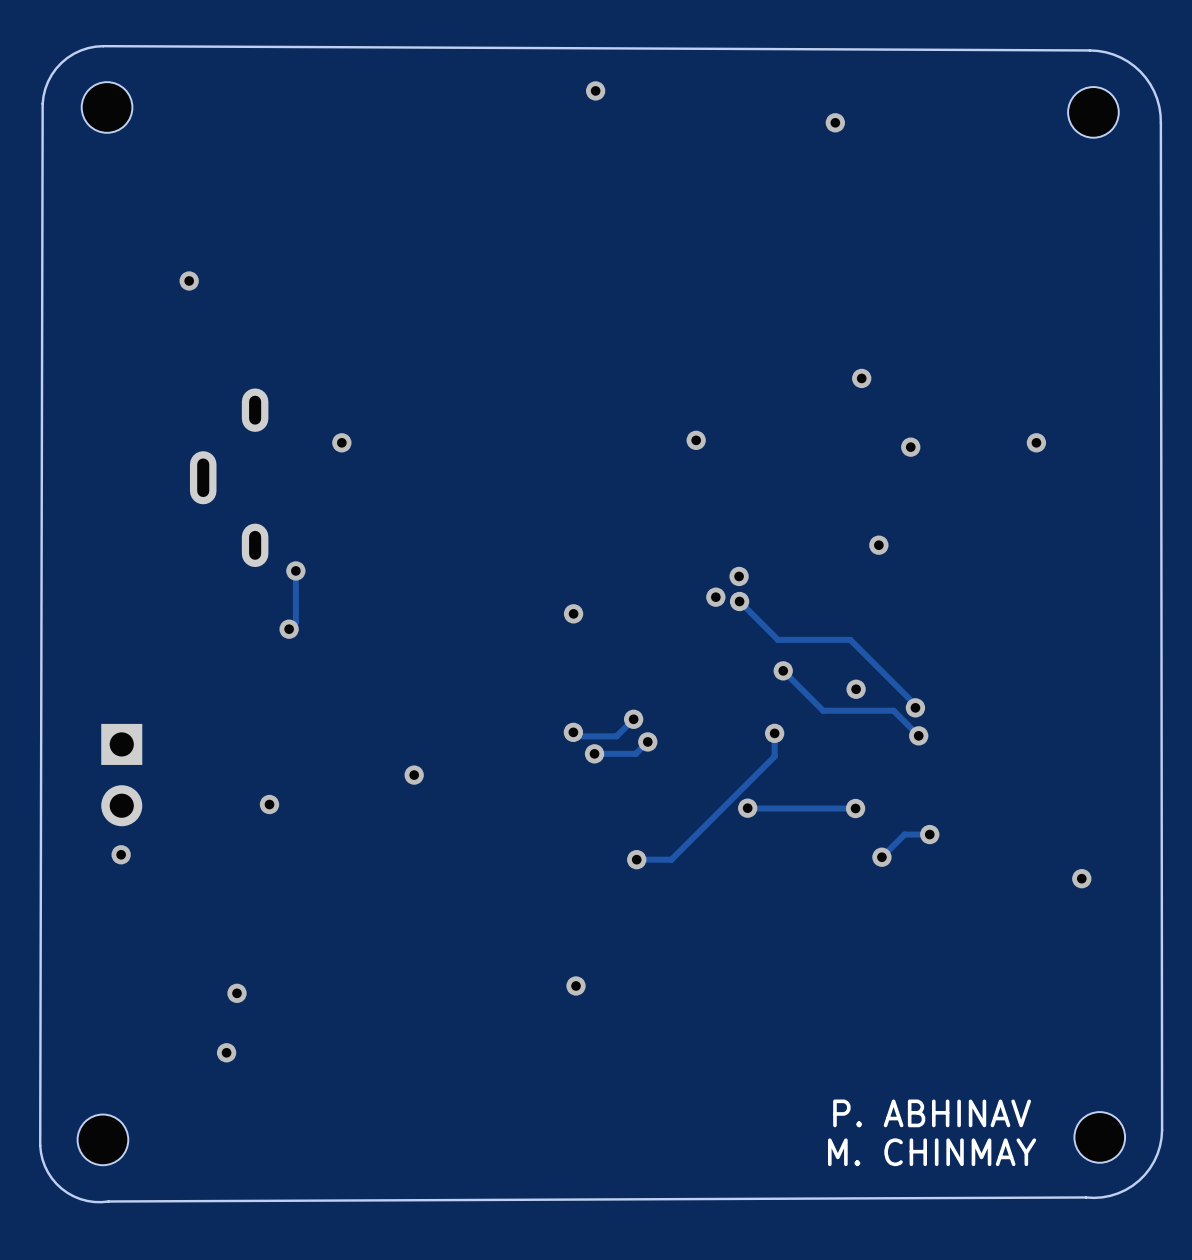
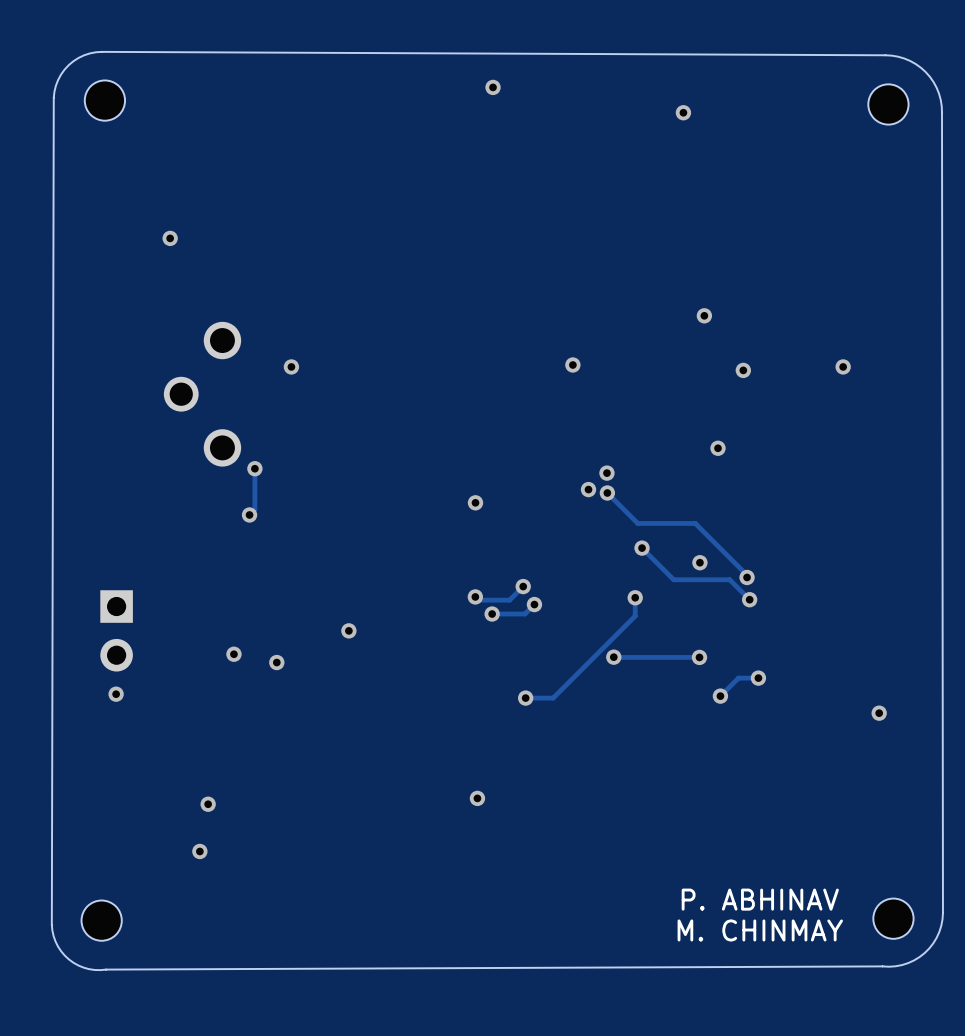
part footprint: [189, 388, 269, 568] -> [163, 321, 242, 467]
via: none -> (276, 662)

